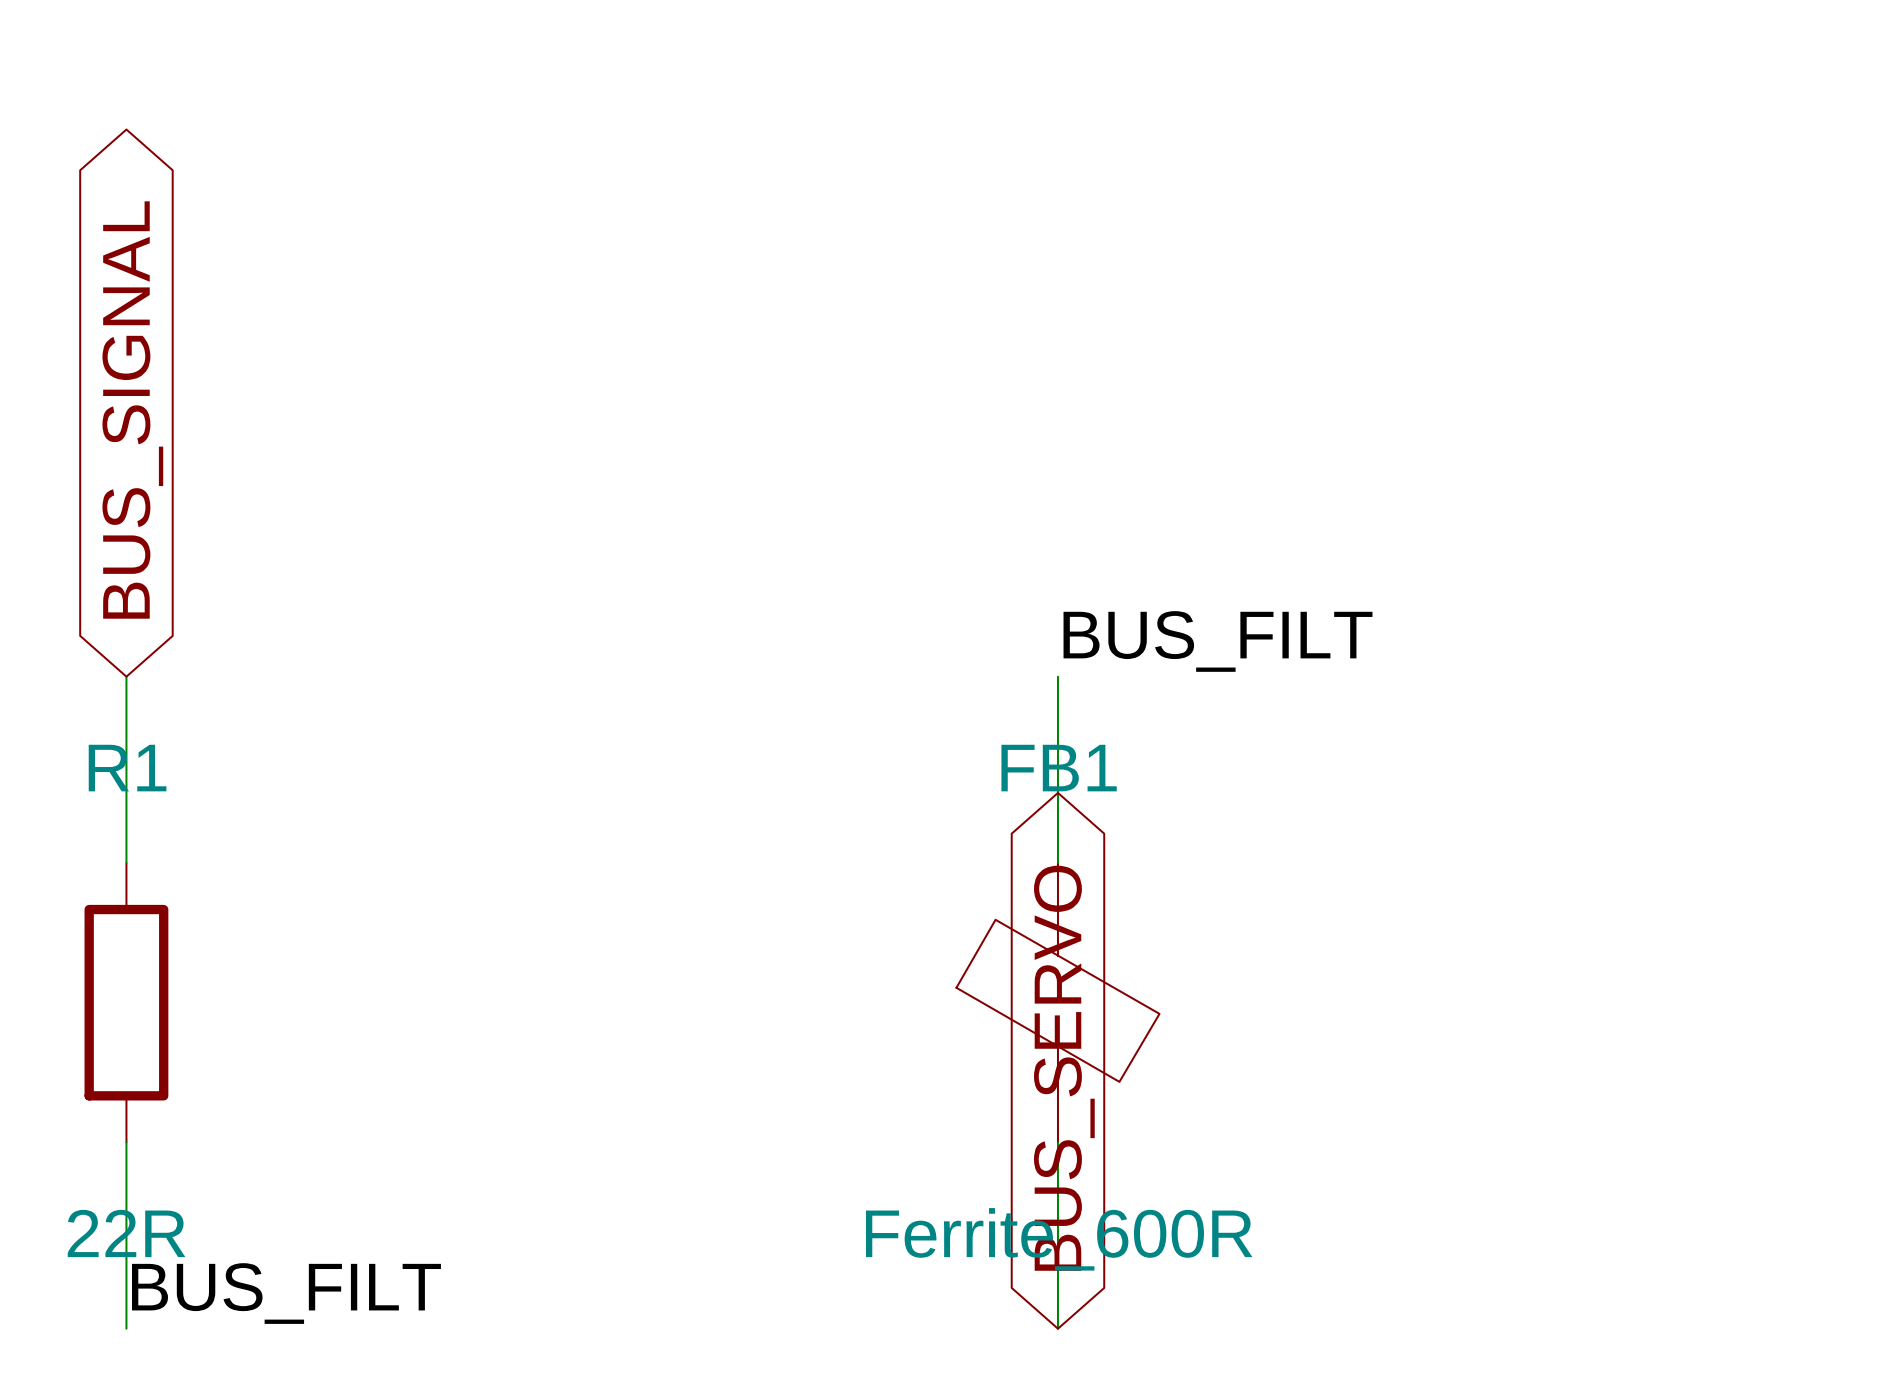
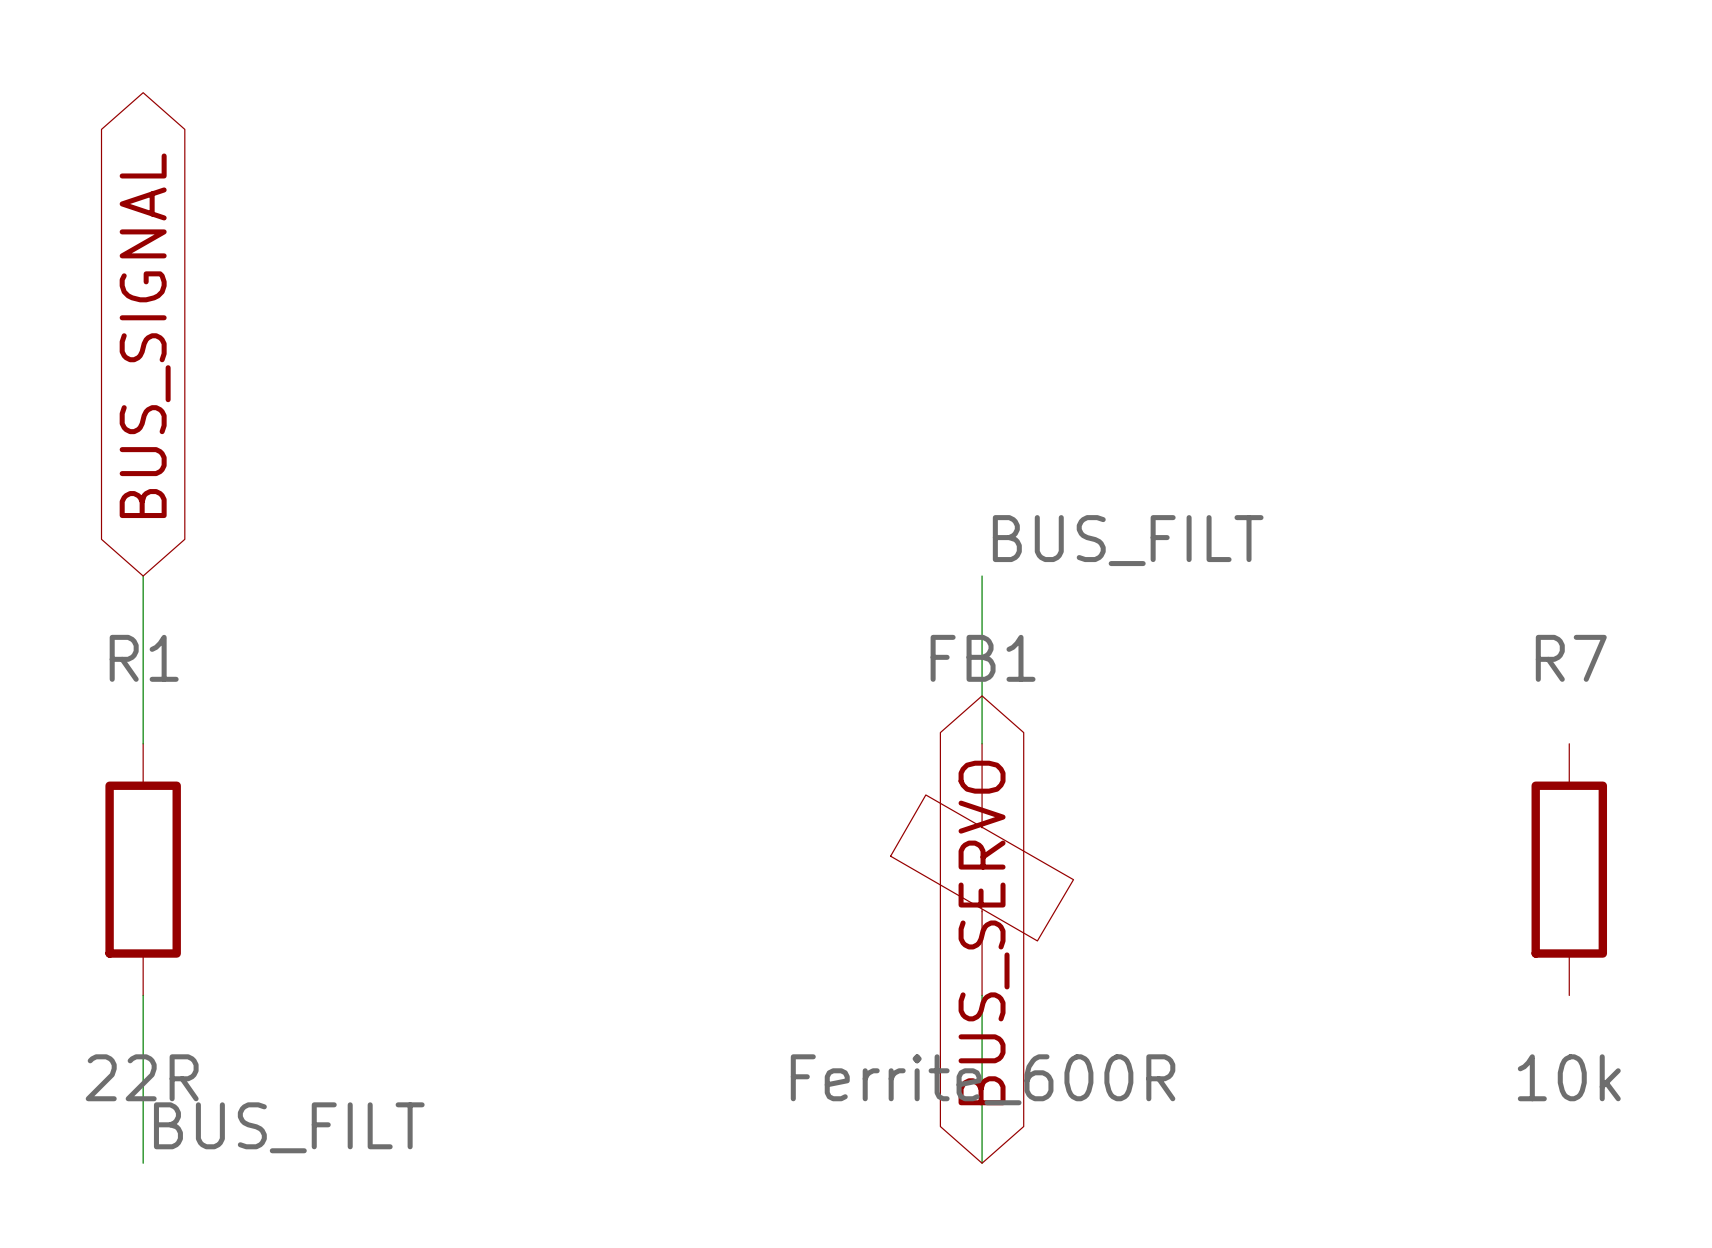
R7: none -> 10k (1569, 869)

